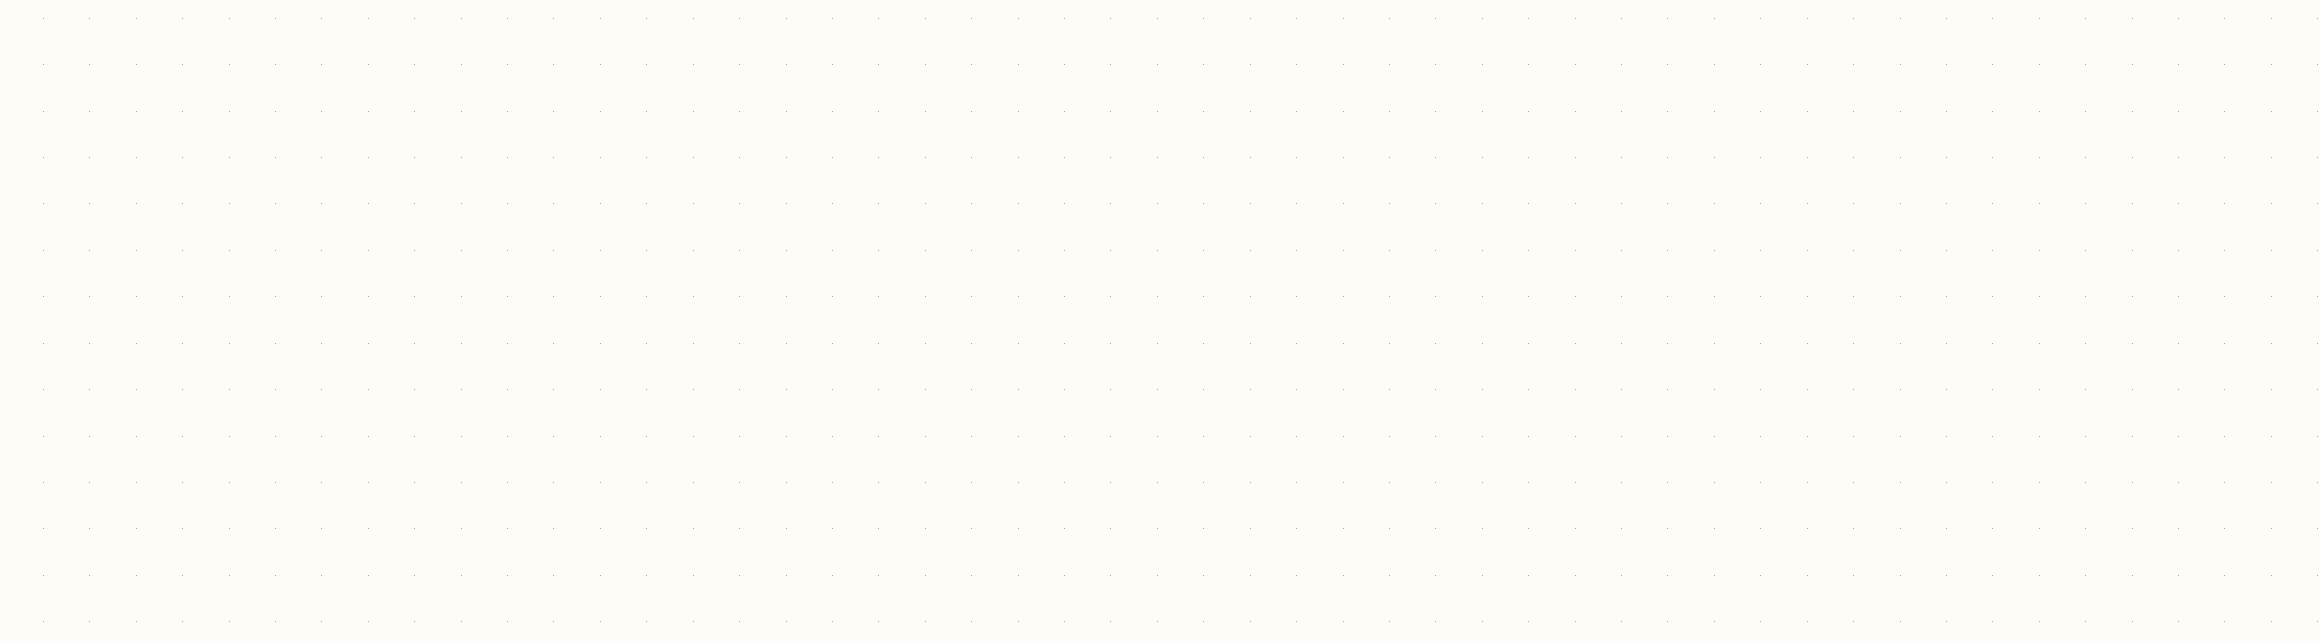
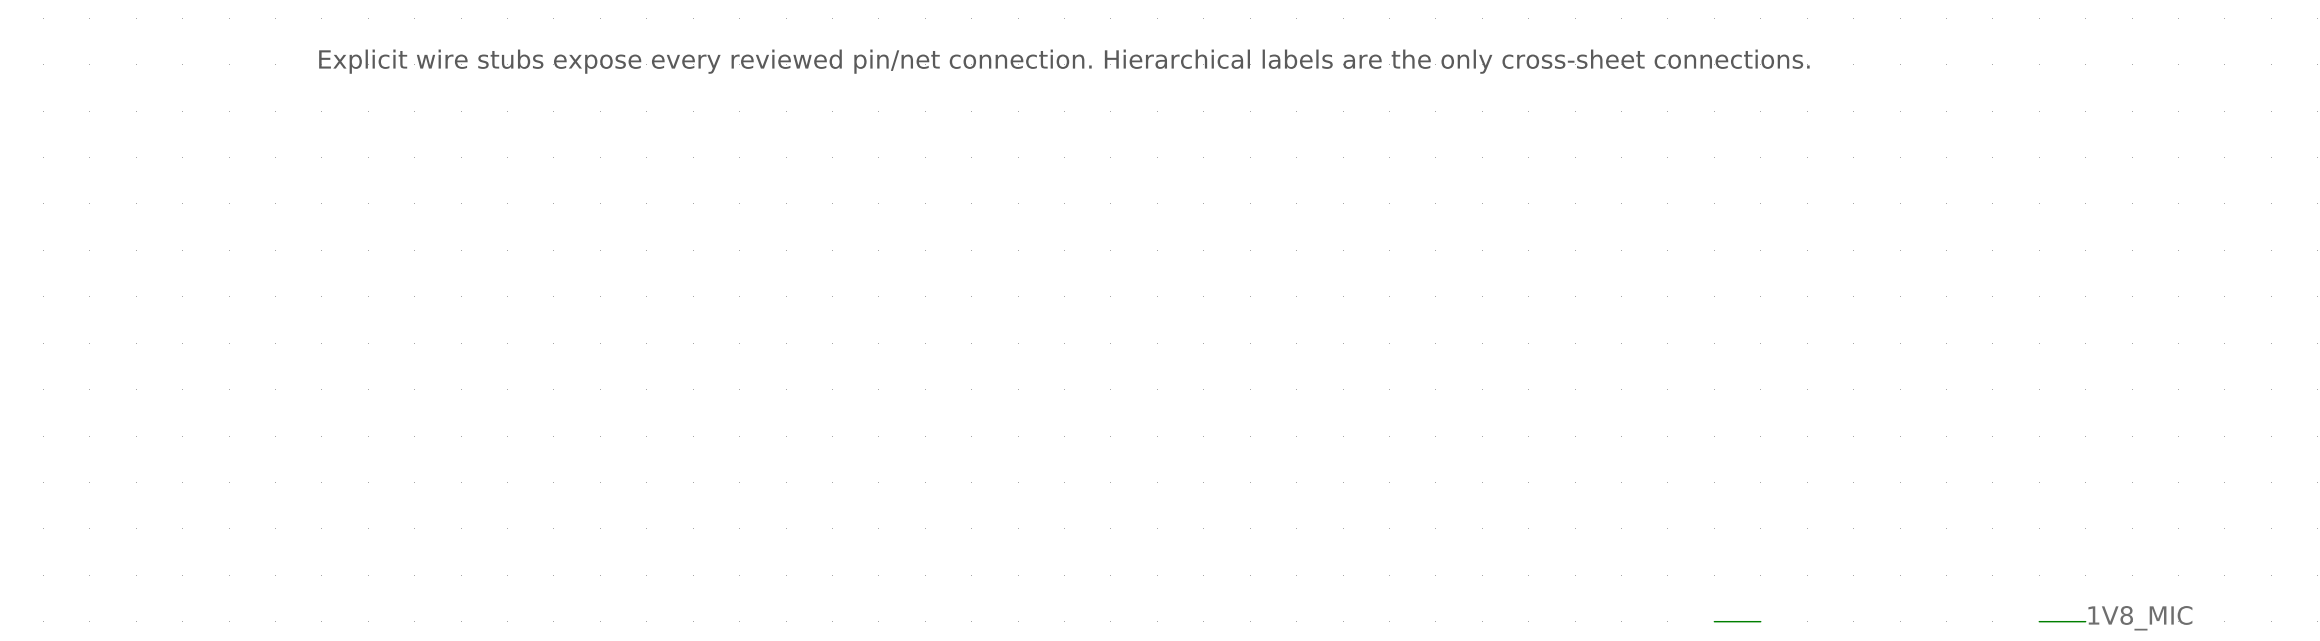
text: none -> Explicit wire stubs expose every reviewed pin/net connection. Hierarchical labels are the only cross-sheet connections. (1064, 61)
label: none -> 1V8_MIC (2140, 618)
wire: none -> (1714, 621) (1760, 621)
wire: none -> (2039, 621) (2085, 621)

